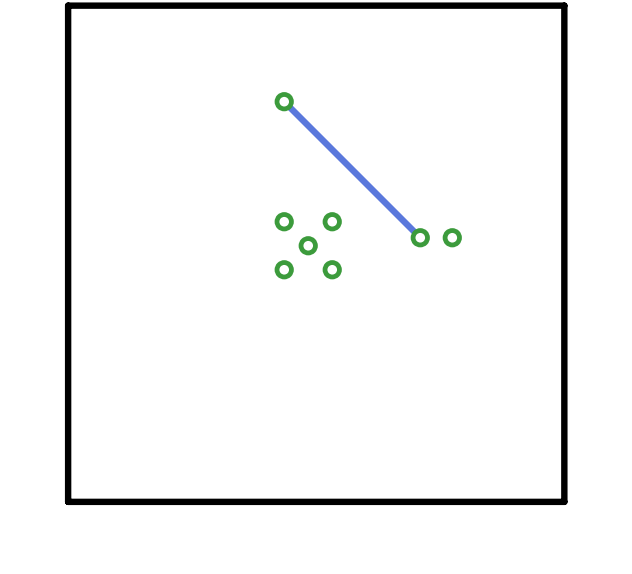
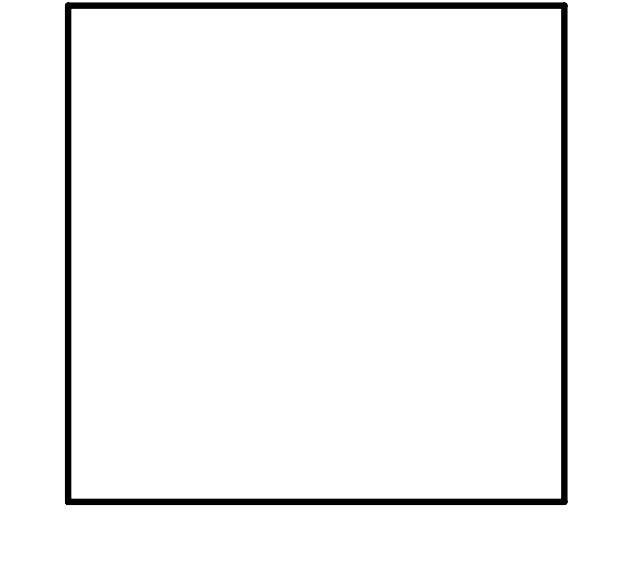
track: (284, 101) (420, 237) -> none
via: (284, 101) -> none
via: (284, 221) -> none
via: (332, 221) -> none
via: (420, 237) -> none
via: (452, 237) -> none
via: (308, 245) -> none
via: (284, 269) -> none
via: (332, 269) -> none

